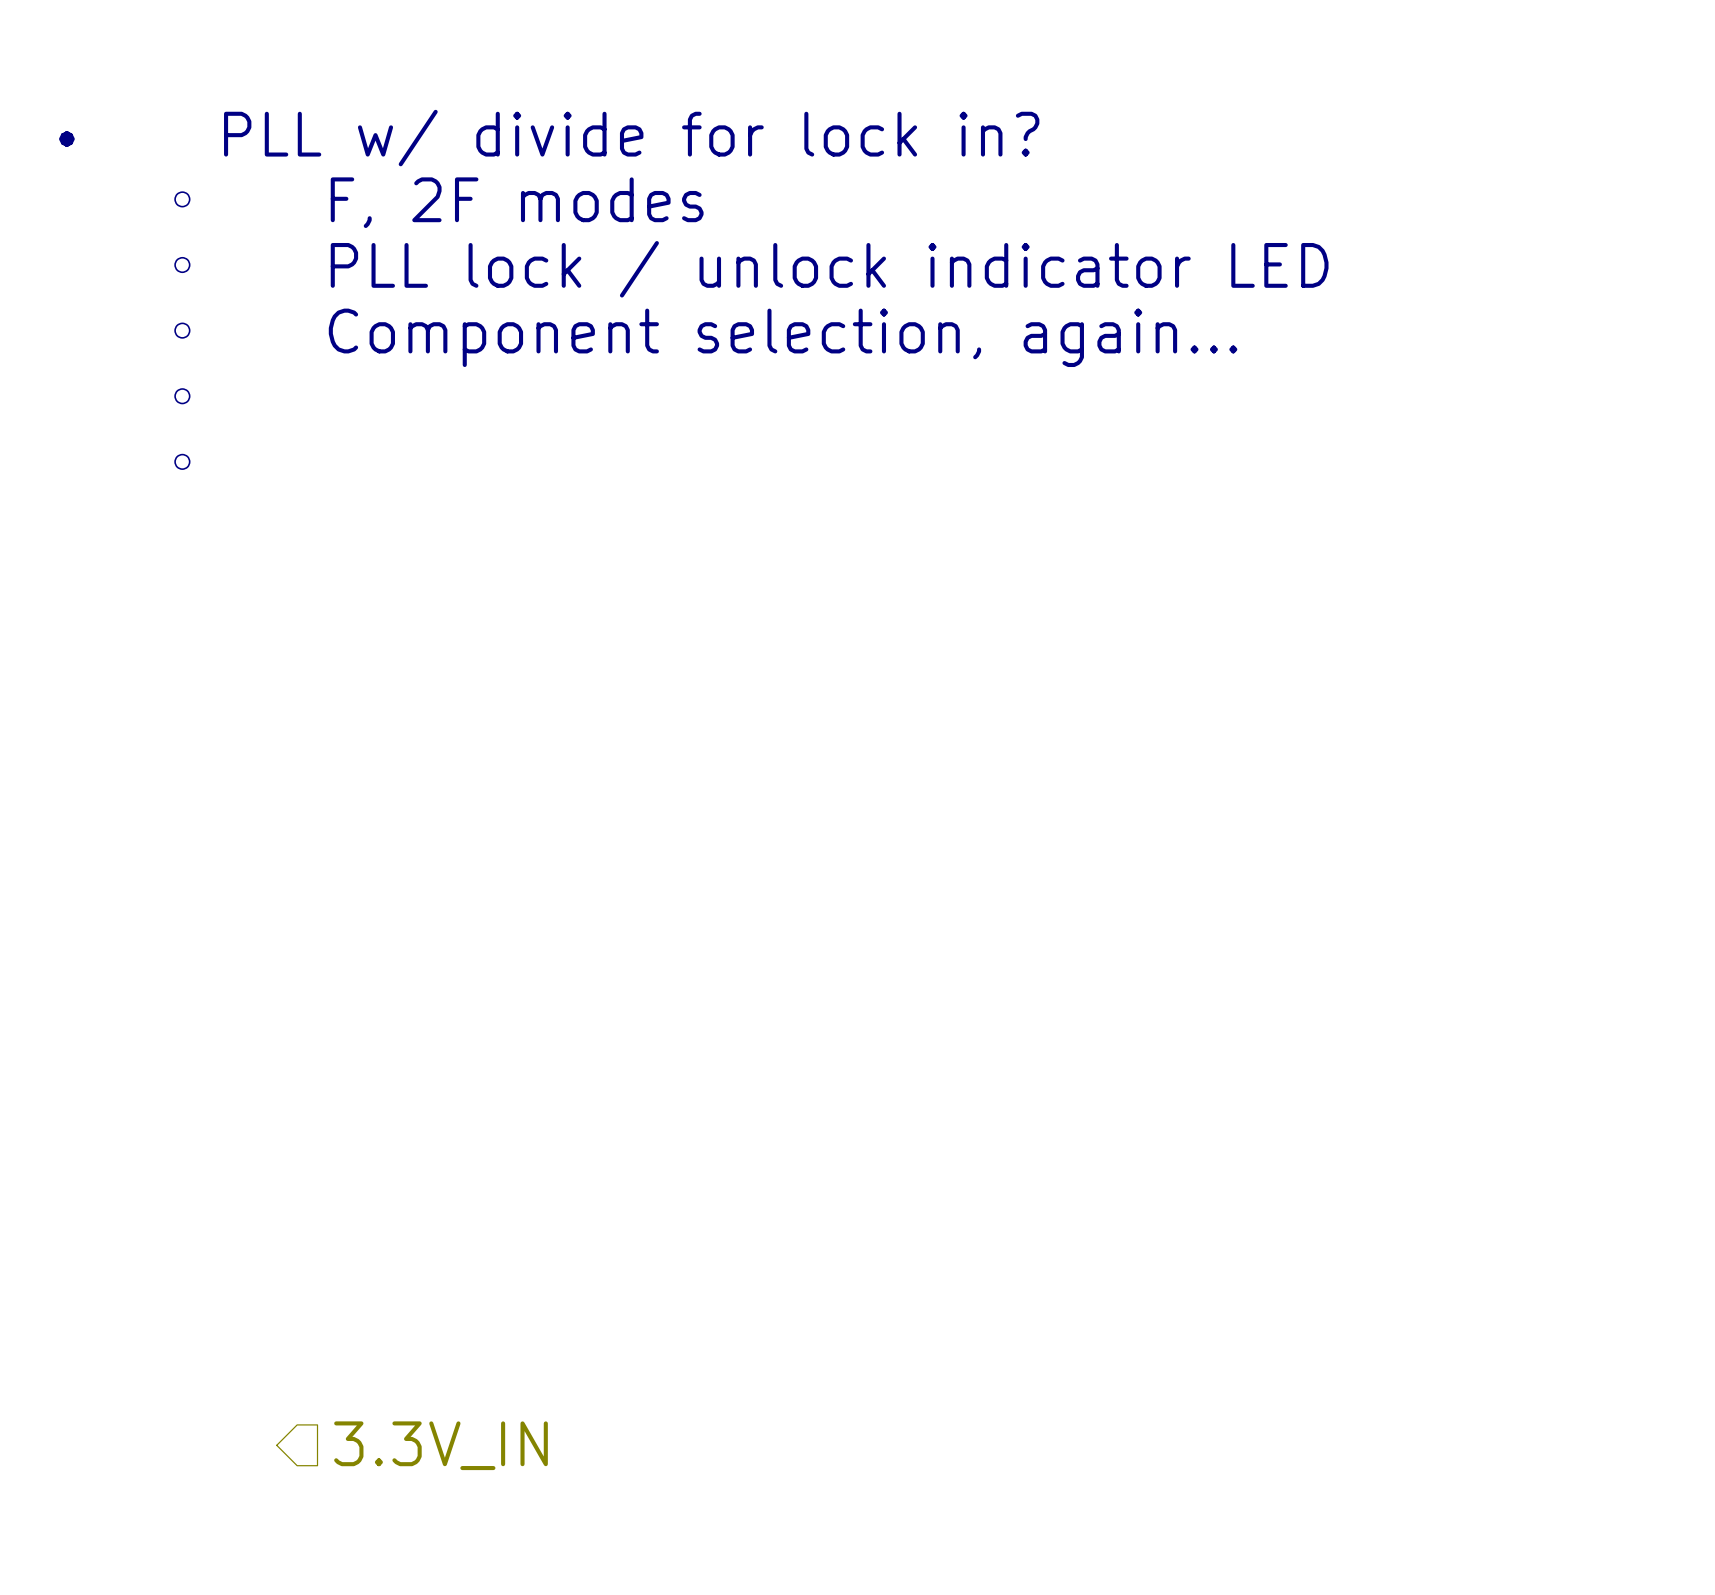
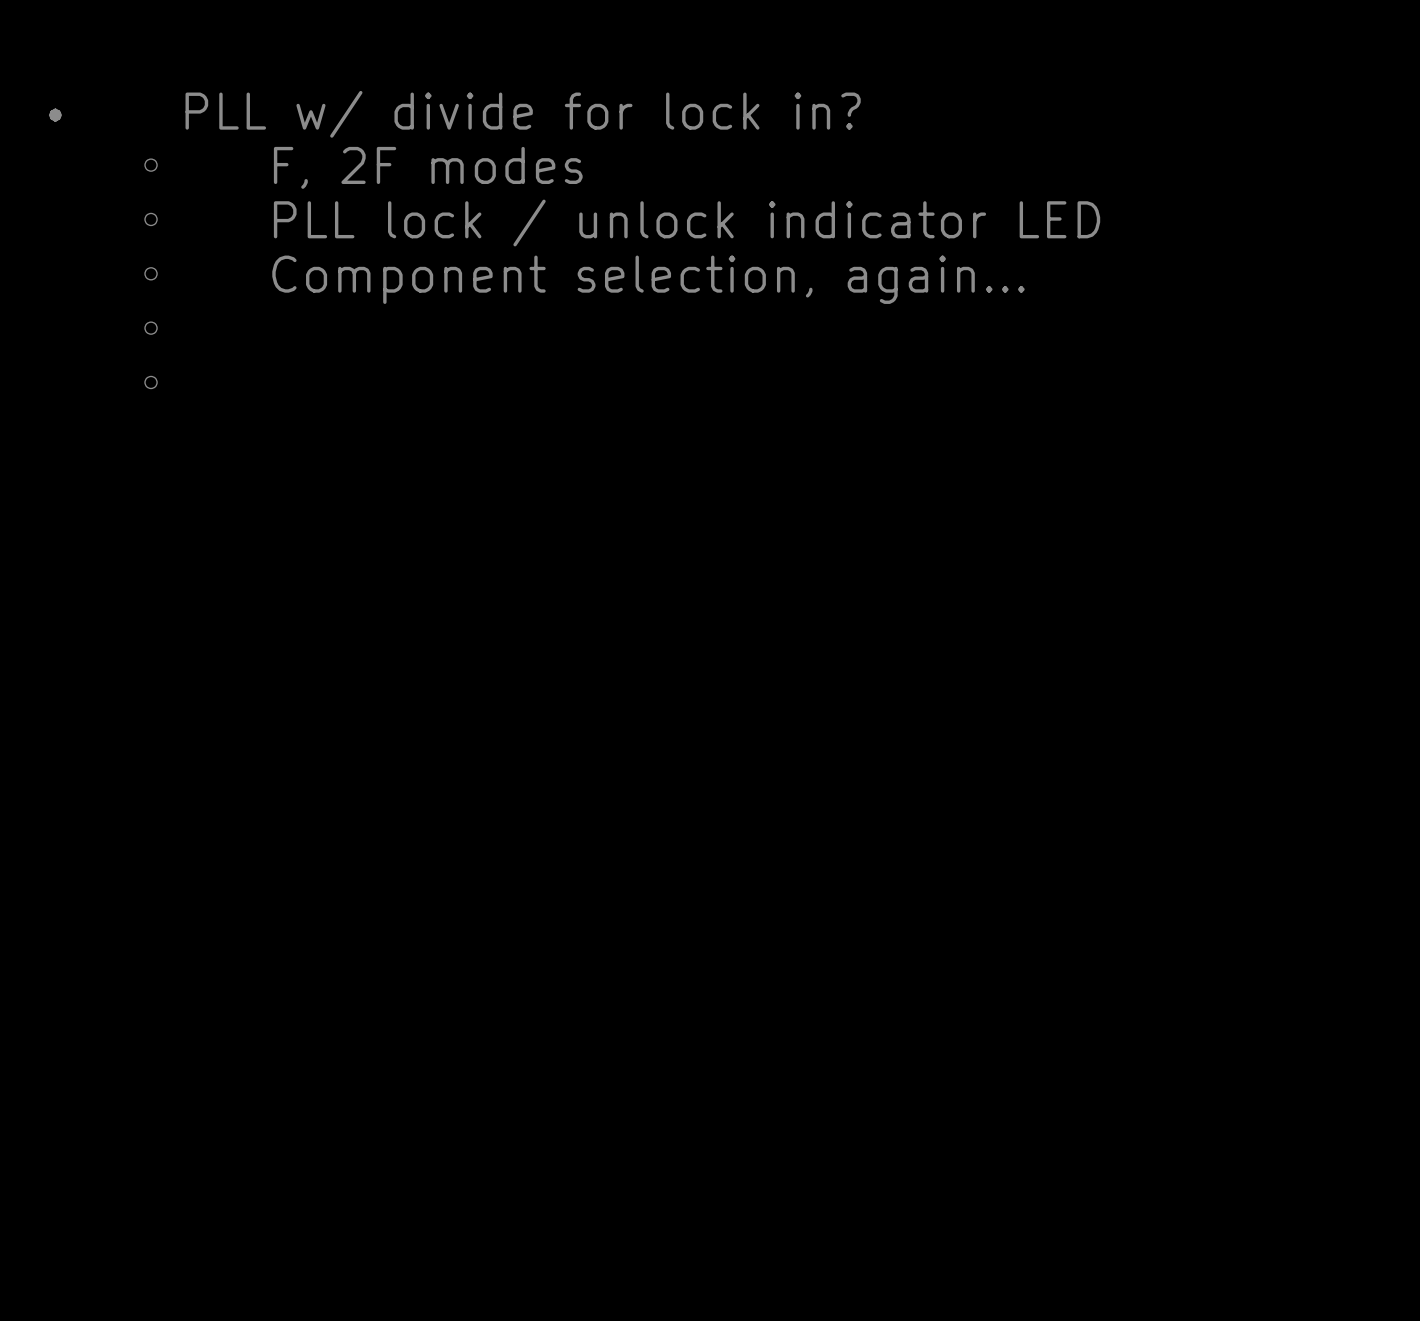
hierarchical label: 3.3V_IN (441, 1445) -> none

